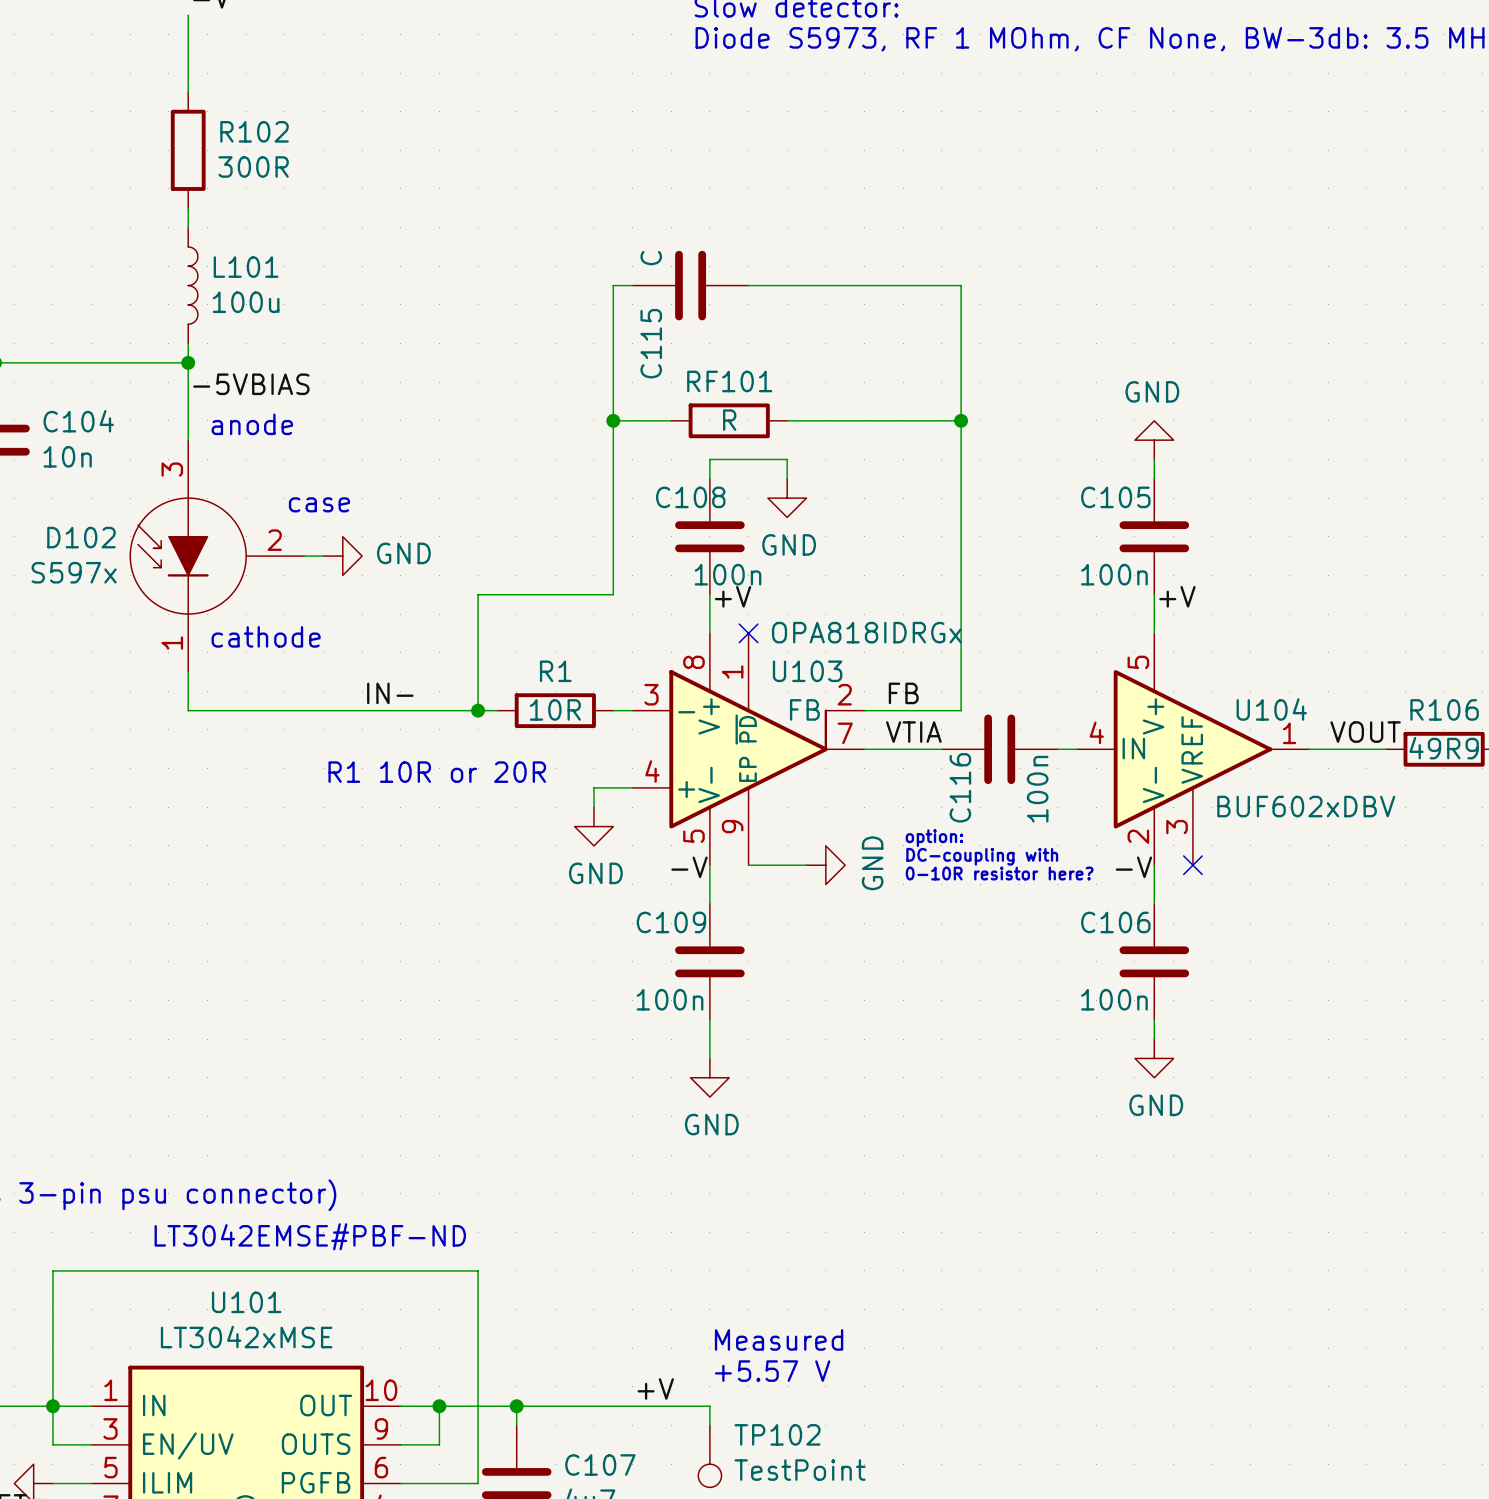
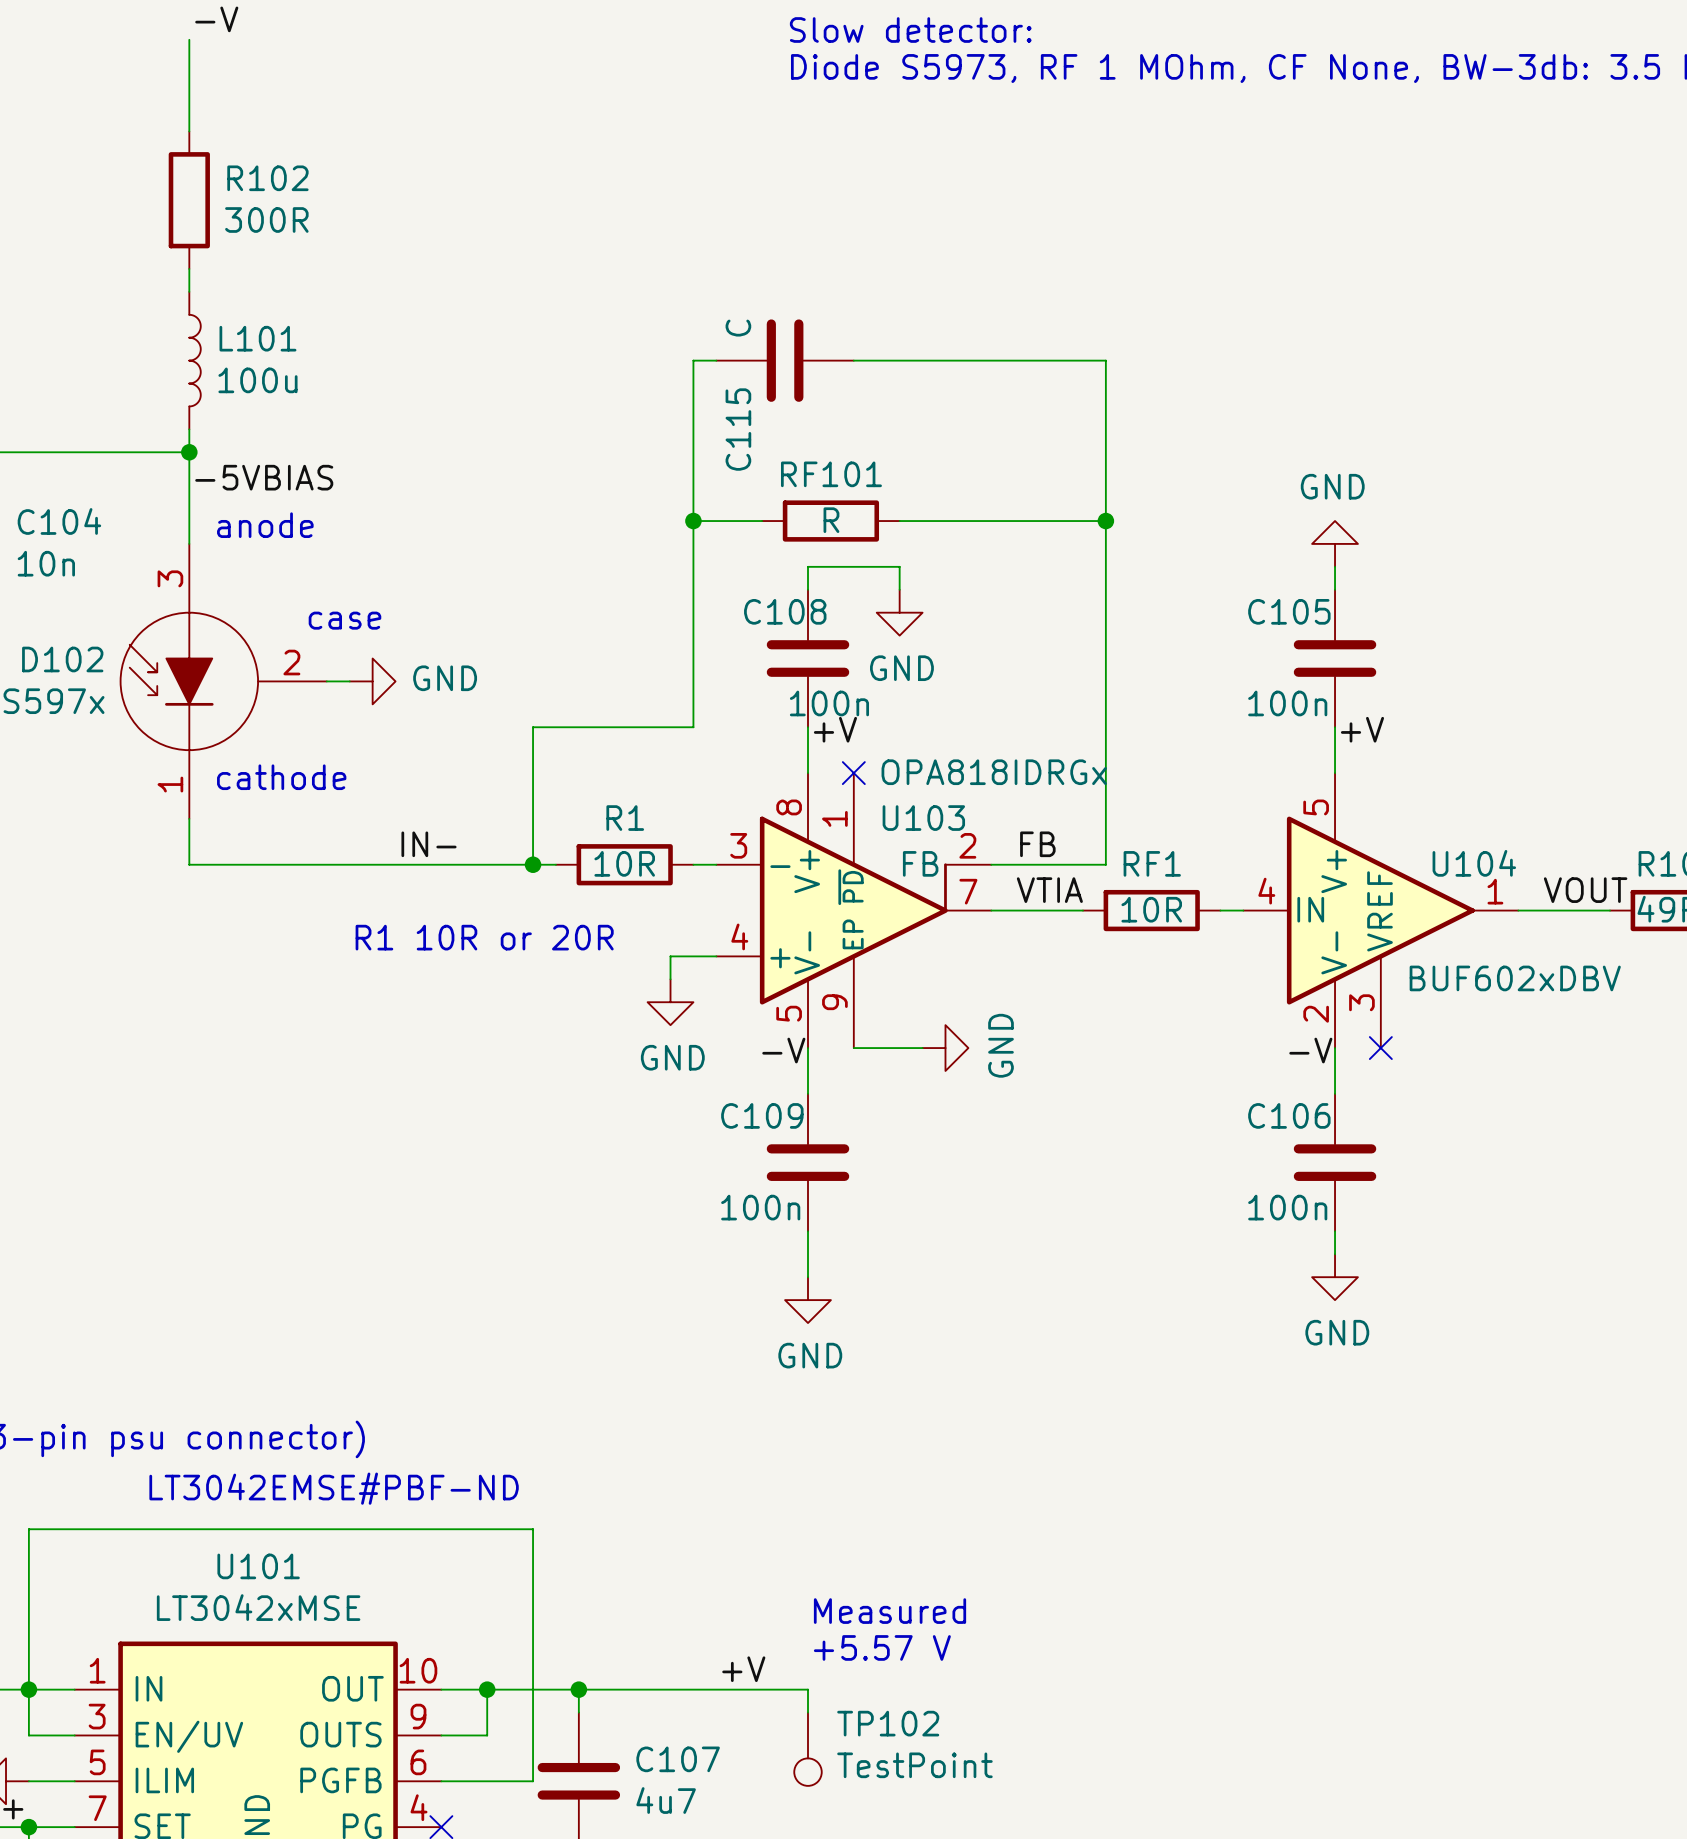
C116: 100n (999, 749) -> none
RF1: none -> 10R (1151, 910)
text: option: (934, 838) -> none
text: DC-coupling with (982, 856) -> none
text: 0-10R resistor here? (999, 873) -> none

